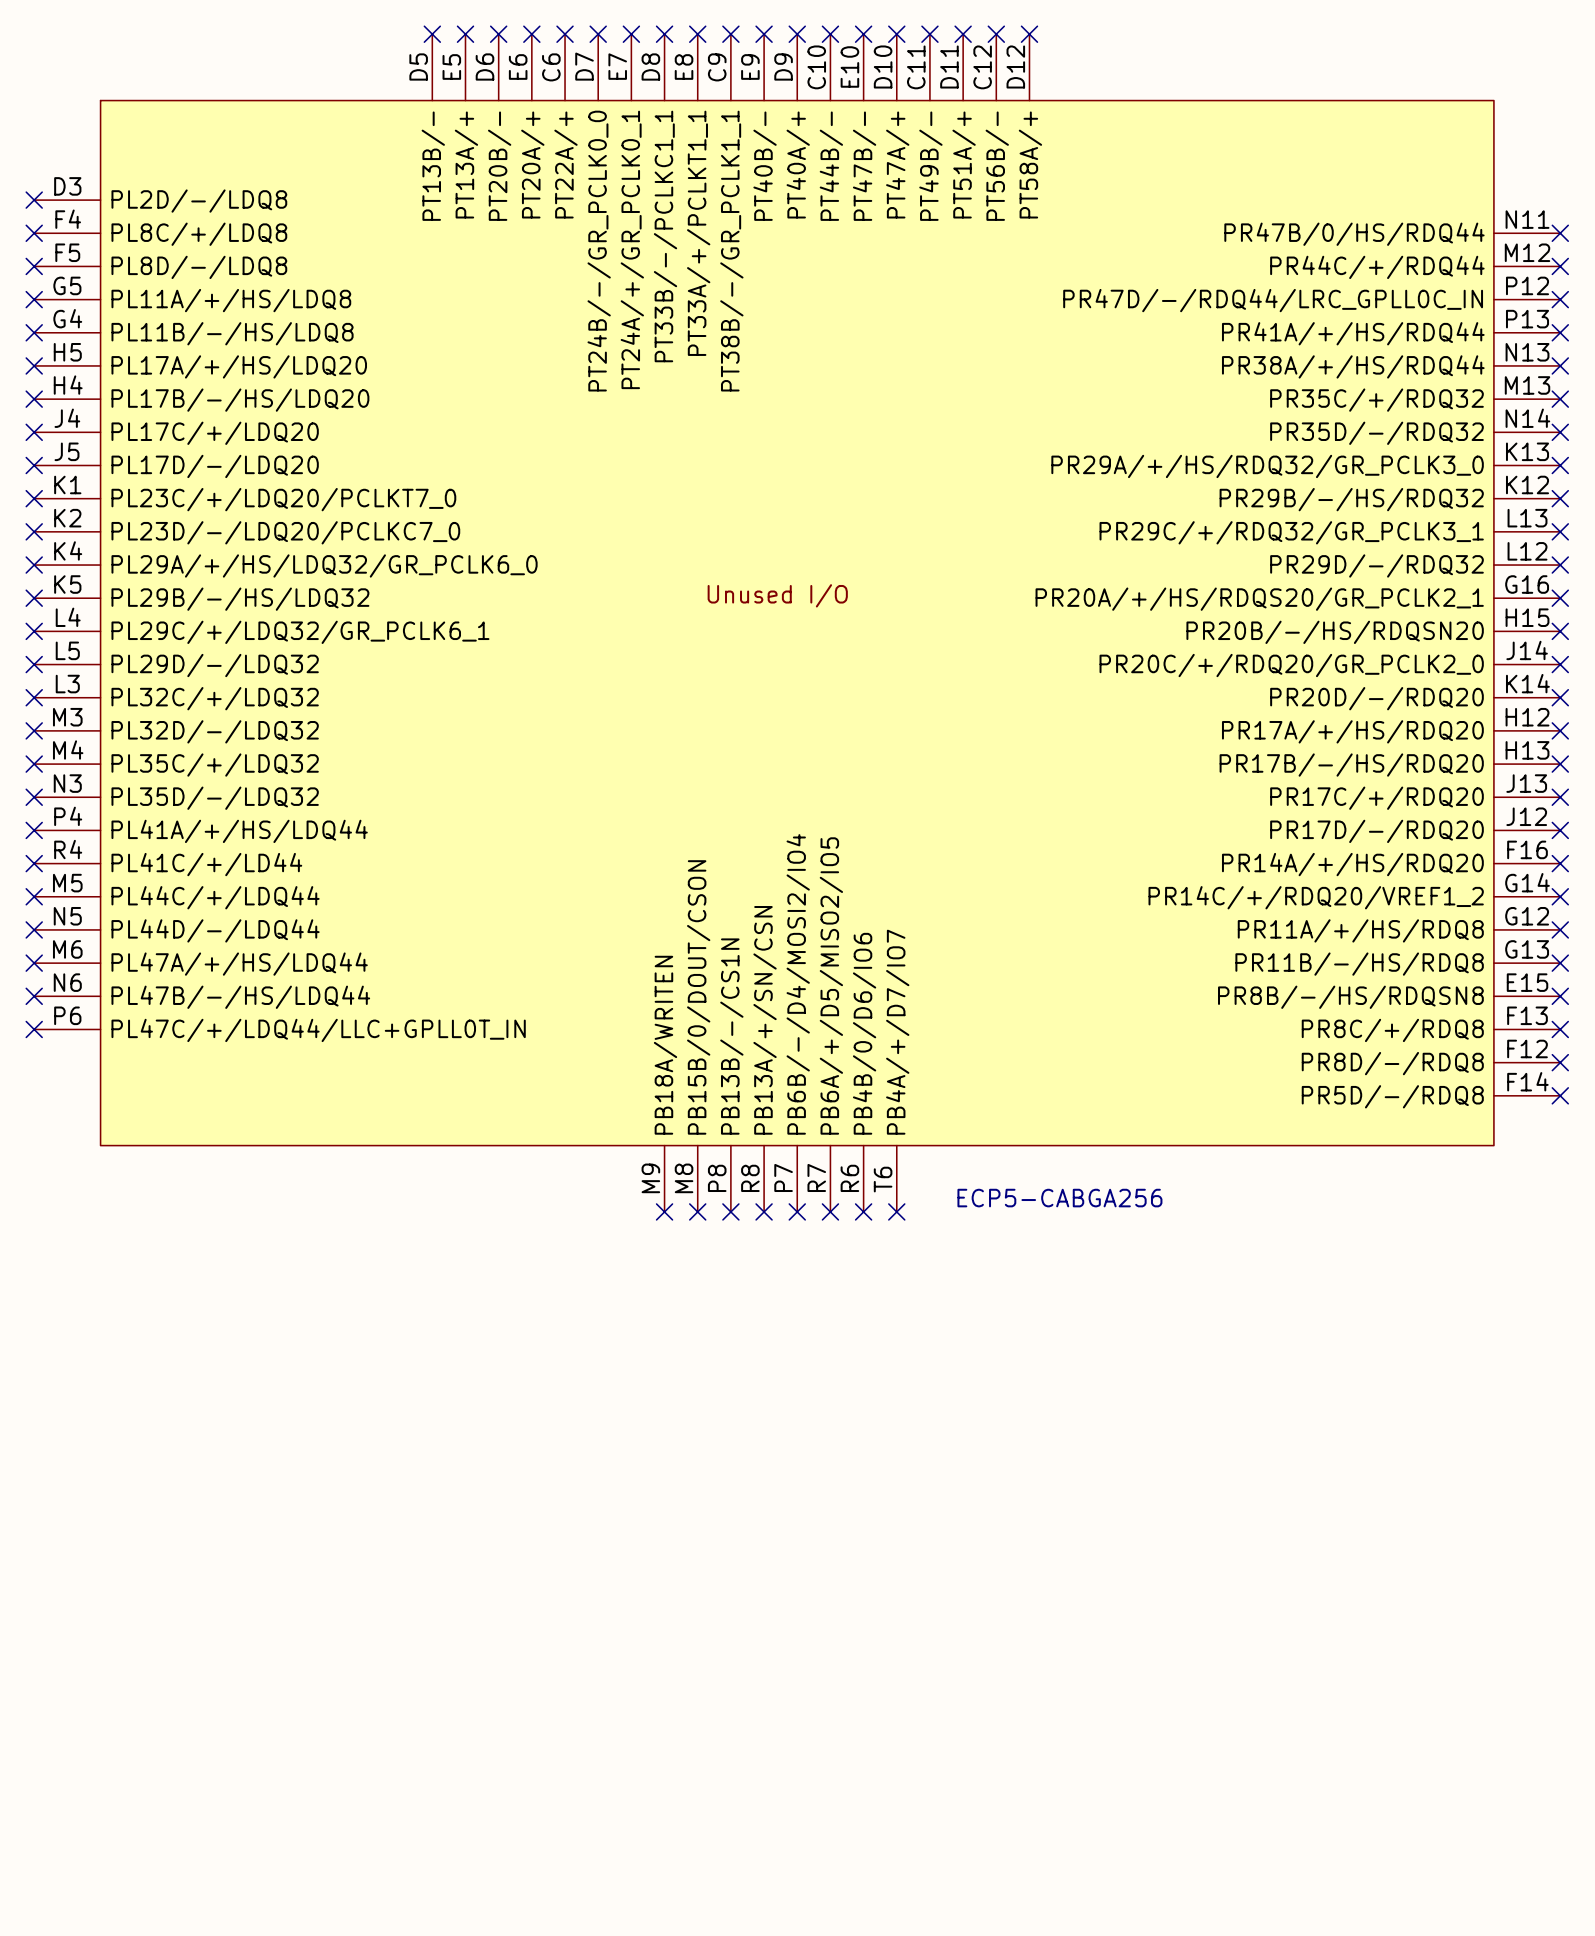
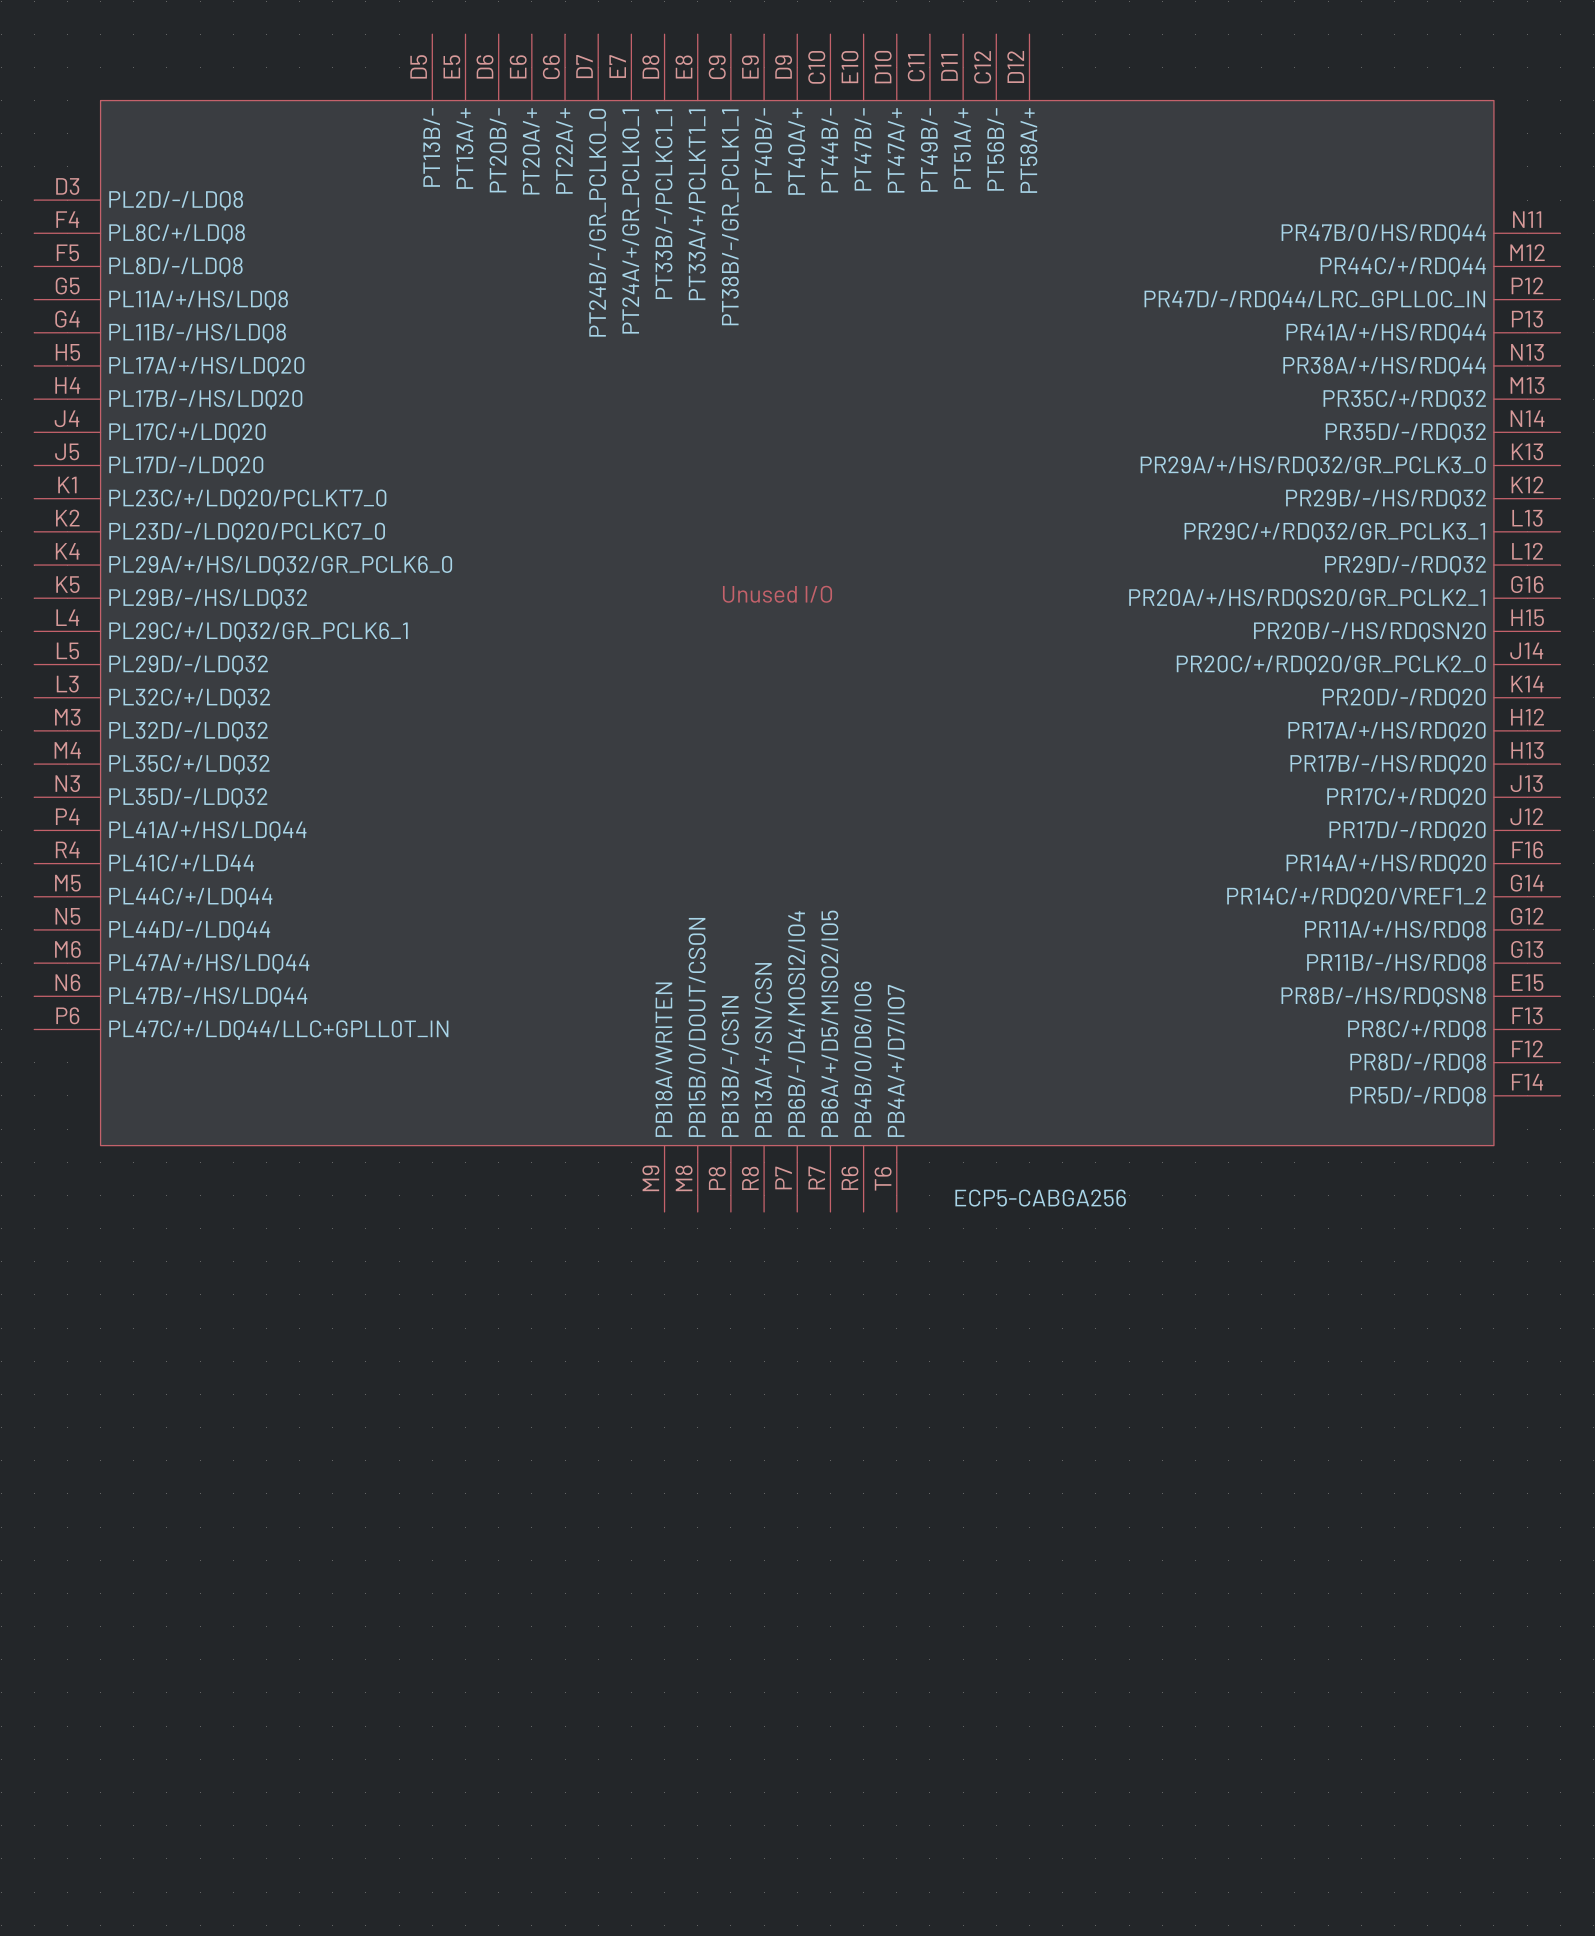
no-connect mark: (432, 34) -> none
no-connect mark: (465, 34) -> none
no-connect mark: (498, 34) -> none
no-connect mark: (531, 34) -> none
no-connect mark: (565, 34) -> none
no-connect mark: (598, 34) -> none
no-connect mark: (631, 34) -> none
no-connect mark: (664, 34) -> none
no-connect mark: (697, 34) -> none
no-connect mark: (730, 34) -> none
no-connect mark: (764, 34) -> none
no-connect mark: (797, 34) -> none
no-connect mark: (830, 34) -> none
no-connect mark: (863, 34) -> none
no-connect mark: (896, 34) -> none
no-connect mark: (929, 34) -> none
no-connect mark: (963, 34) -> none
no-connect mark: (996, 34) -> none
no-connect mark: (1029, 34) -> none
no-connect mark: (34, 200) -> none
no-connect mark: (34, 233) -> none
no-connect mark: (1560, 233) -> none
no-connect mark: (34, 266) -> none
no-connect mark: (1560, 266) -> none
no-connect mark: (34, 299) -> none
no-connect mark: (1560, 299) -> none
no-connect mark: (34, 332) -> none
no-connect mark: (1560, 332) -> none
no-connect mark: (34, 365) -> none
no-connect mark: (1560, 365) -> none
no-connect mark: (34, 399) -> none
no-connect mark: (1560, 399) -> none
no-connect mark: (34, 432) -> none
no-connect mark: (1560, 432) -> none
no-connect mark: (34, 465) -> none
no-connect mark: (1560, 465) -> none
no-connect mark: (34, 498) -> none
no-connect mark: (1560, 498) -> none
no-connect mark: (34, 531) -> none
no-connect mark: (1560, 531) -> none
no-connect mark: (34, 565) -> none
no-connect mark: (1560, 565) -> none
no-connect mark: (34, 598) -> none
no-connect mark: (1560, 598) -> none
no-connect mark: (34, 631) -> none
no-connect mark: (1560, 631) -> none
no-connect mark: (34, 664) -> none
no-connect mark: (1560, 664) -> none
no-connect mark: (34, 697) -> none
no-connect mark: (1560, 697) -> none
no-connect mark: (34, 730) -> none
no-connect mark: (1560, 730) -> none
no-connect mark: (34, 764) -> none
no-connect mark: (1560, 764) -> none
no-connect mark: (34, 797) -> none
no-connect mark: (1560, 797) -> none
no-connect mark: (34, 830) -> none
no-connect mark: (1560, 830) -> none
no-connect mark: (34, 863) -> none
no-connect mark: (1560, 863) -> none
no-connect mark: (34, 896) -> none
no-connect mark: (1560, 896) -> none
no-connect mark: (34, 929) -> none
no-connect mark: (1560, 929) -> none
no-connect mark: (34, 963) -> none
no-connect mark: (1560, 963) -> none
no-connect mark: (34, 996) -> none
no-connect mark: (1560, 996) -> none
no-connect mark: (34, 1029) -> none
no-connect mark: (1560, 1029) -> none
no-connect mark: (1560, 1062) -> none
no-connect mark: (1560, 1095) -> none
no-connect mark: (664, 1211) -> none
no-connect mark: (697, 1211) -> none
no-connect mark: (730, 1211) -> none
no-connect mark: (764, 1211) -> none
no-connect mark: (797, 1211) -> none
no-connect mark: (830, 1211) -> none
no-connect mark: (863, 1211) -> none
no-connect mark: (896, 1211) -> none

